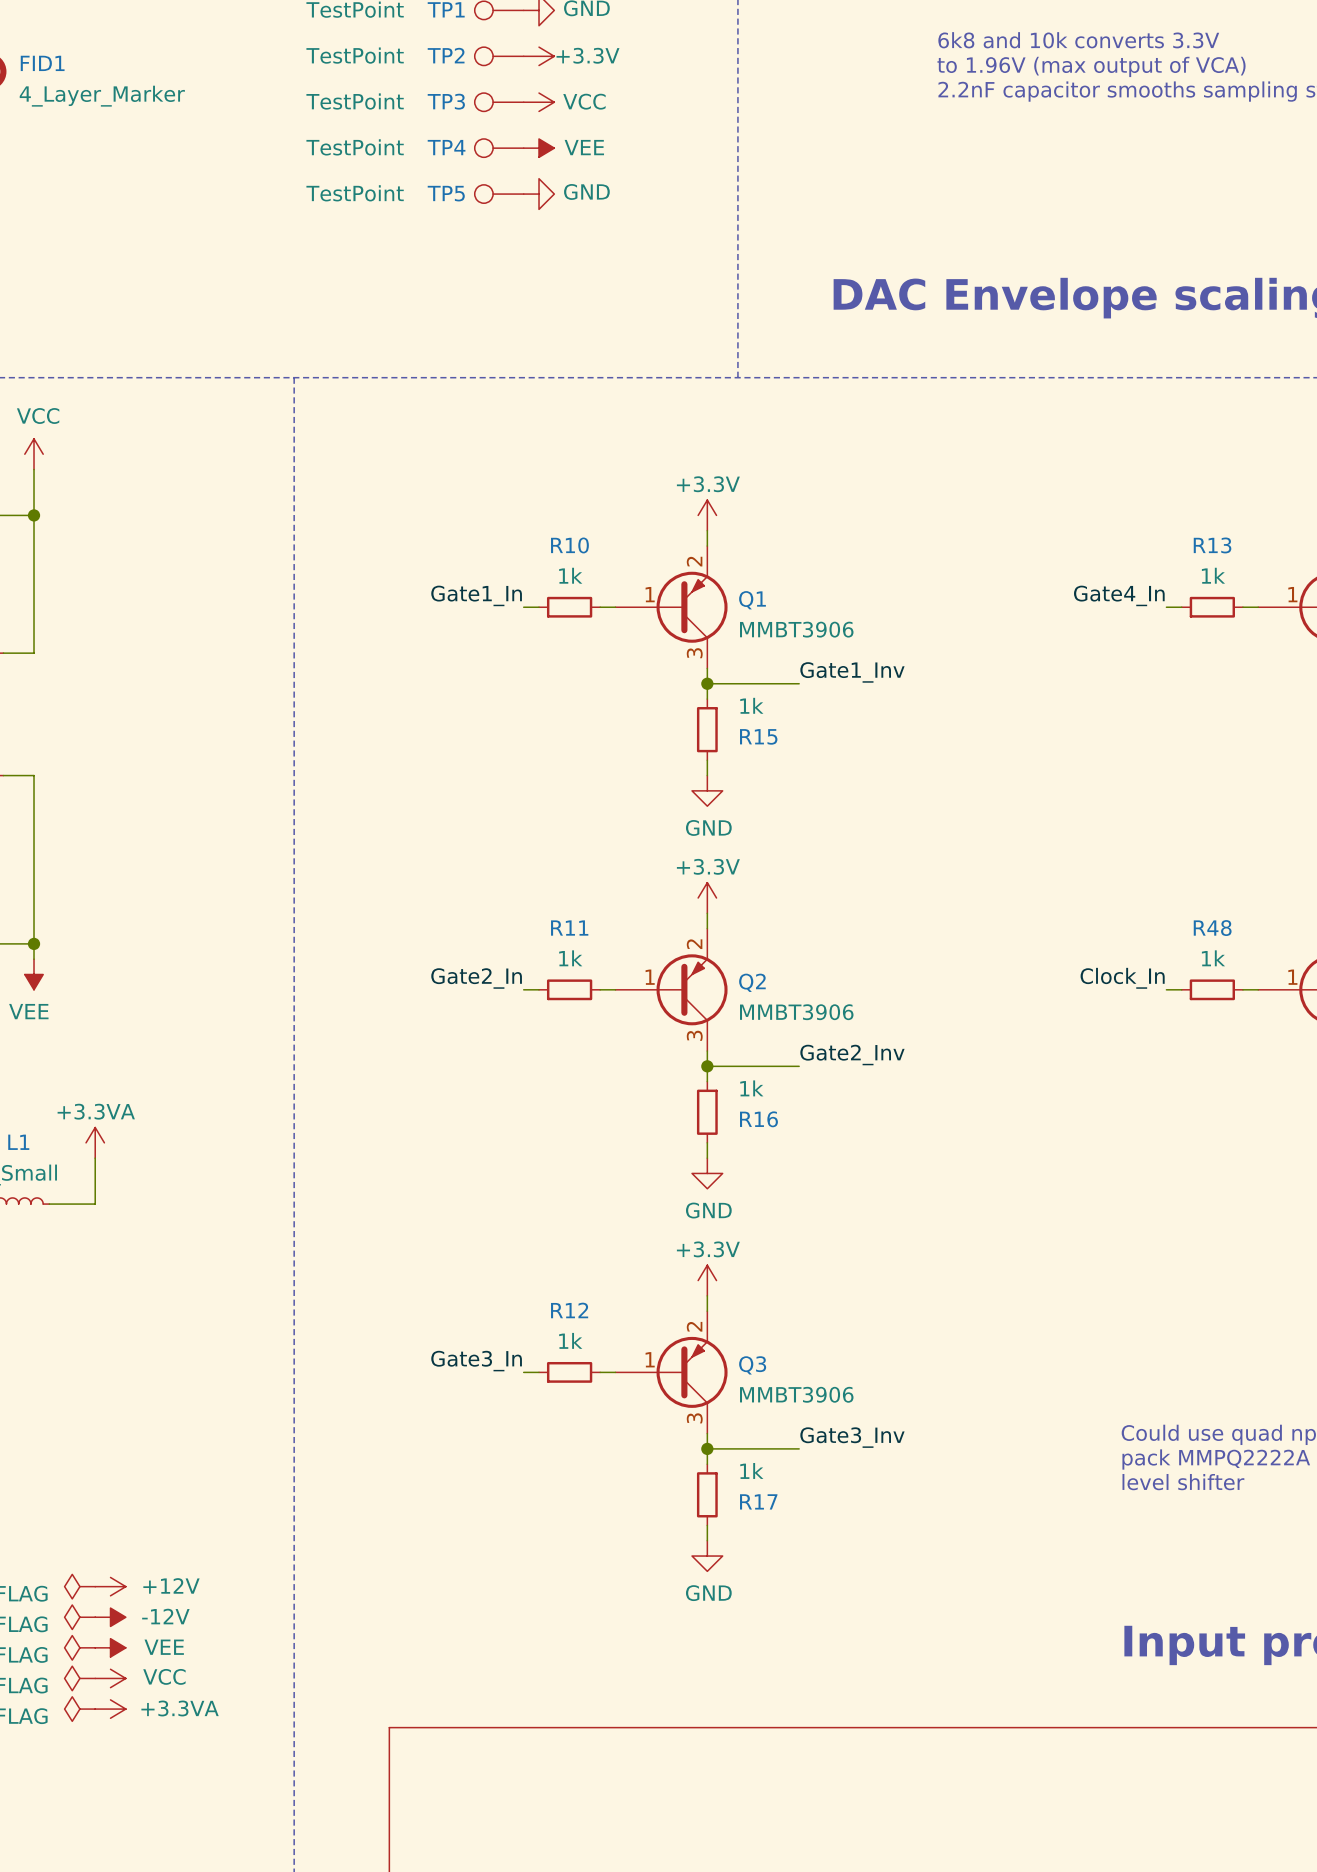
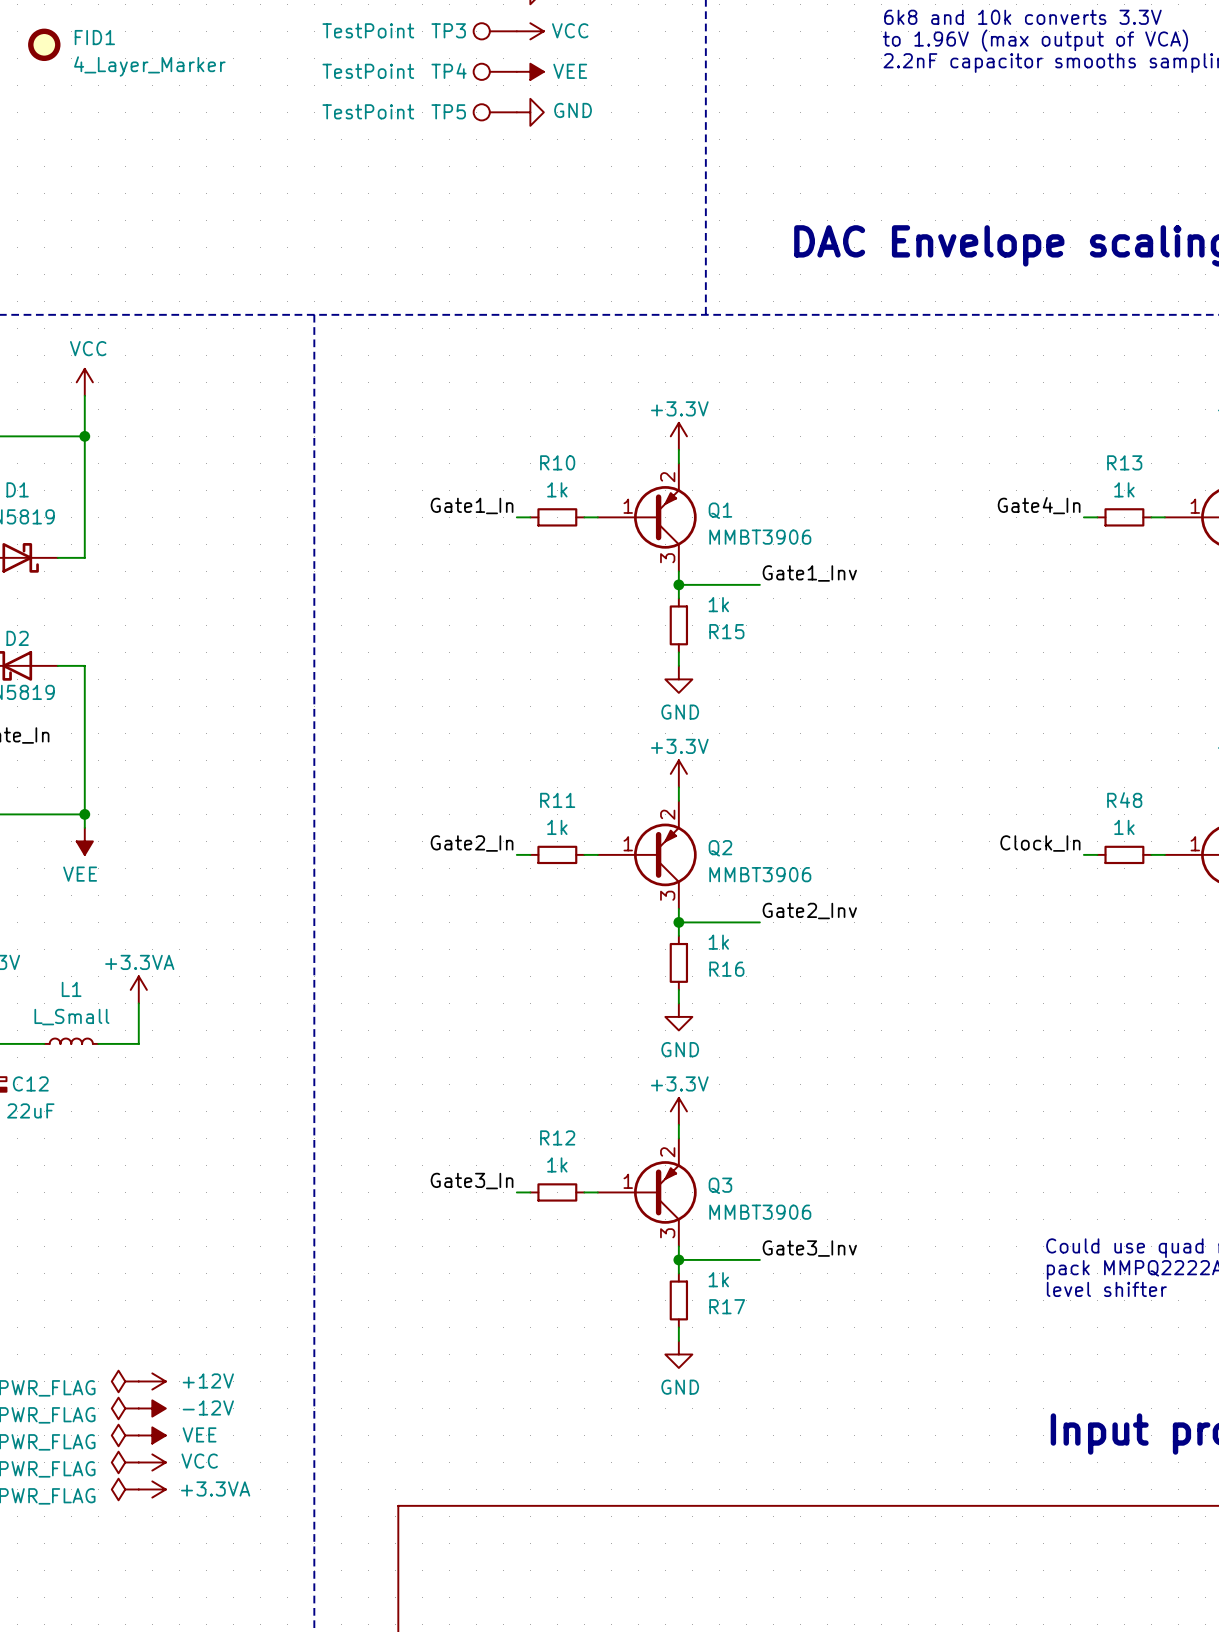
TP2 name: TP2 (446, 55) -> TP3 (448, 30)
power symbol: +3.3V (539, 56) -> VCC (530, 31)
TP3 name: TP3 (446, 101) -> TP4 (449, 70)
power symbol: VCC (539, 102) -> VEE (530, 71)
TP4 name: TP4 (446, 147) -> TP5 (448, 111)
power symbol: VEE (539, 148) -> GND (530, 112)
TP5: TestPoint (499, 194) -> none
power symbol: GND (539, 194) -> none

